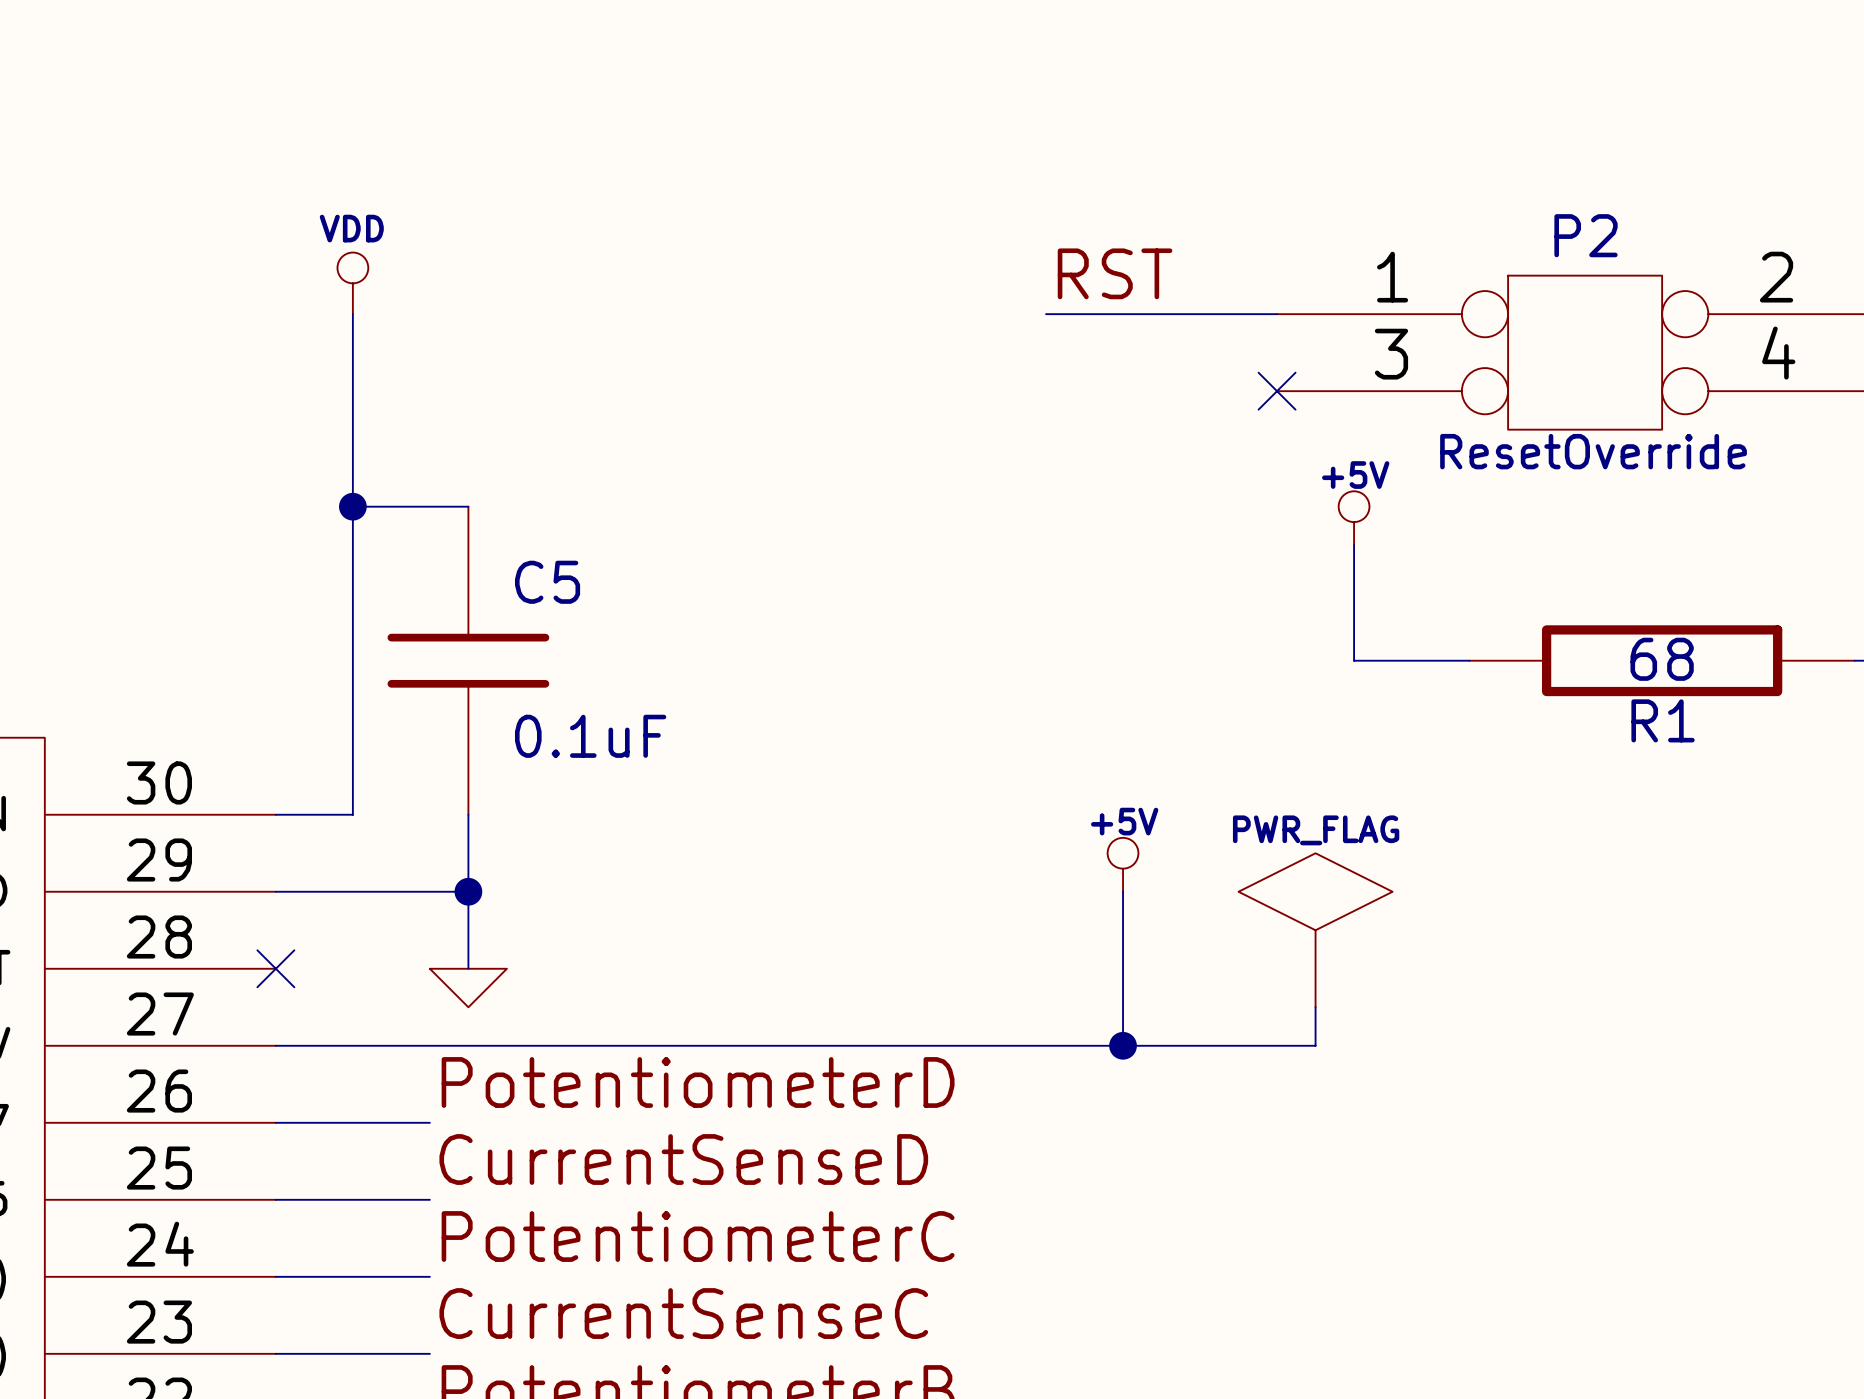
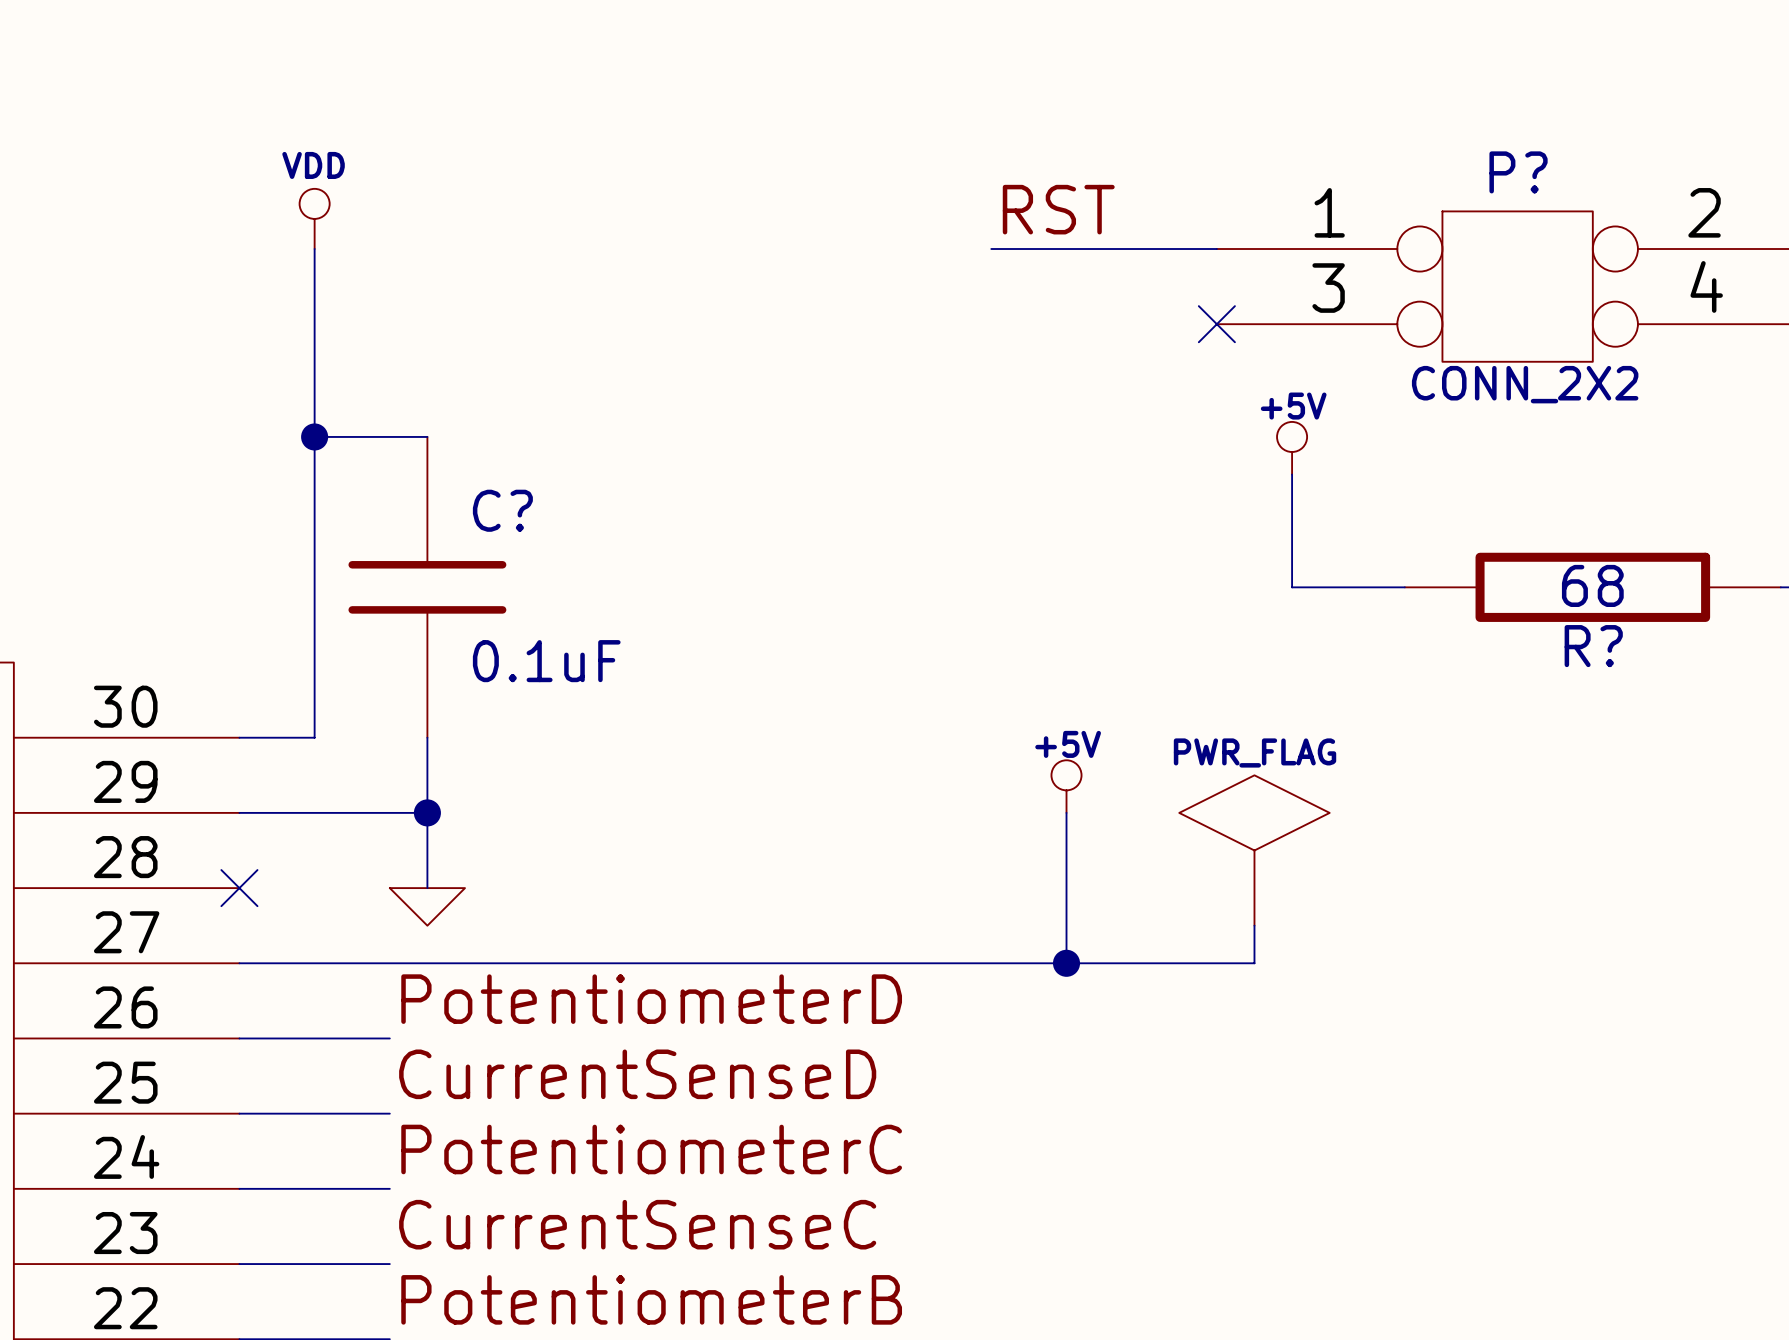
P2 name: P2 (1586, 235) -> P? (1518, 172)
P2 value: ResetOverride (1593, 451) -> CONN_2X2 (1525, 384)
C5 name: C5 (547, 582) -> C? (502, 510)
R1 name: R1 (1663, 720) -> R? (1593, 646)

